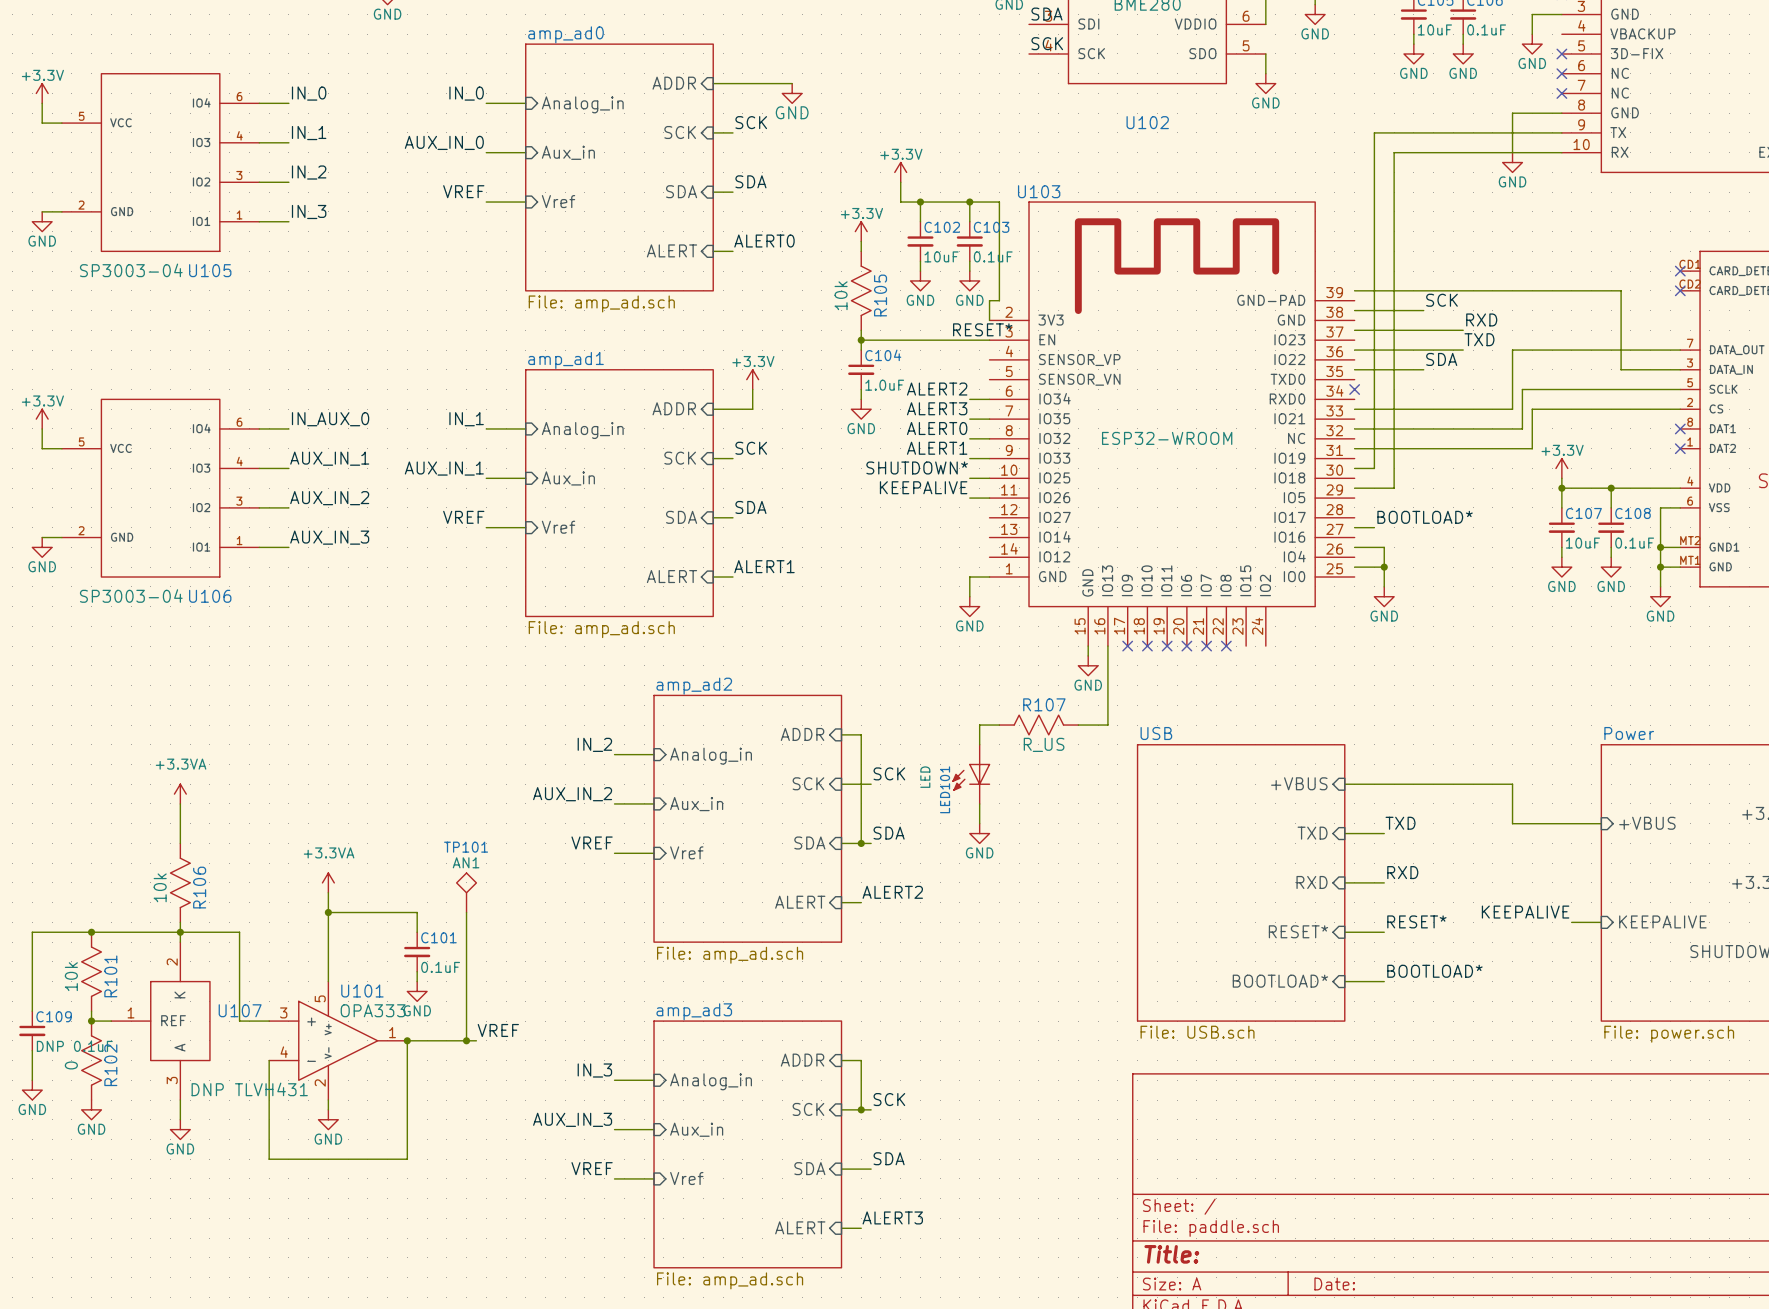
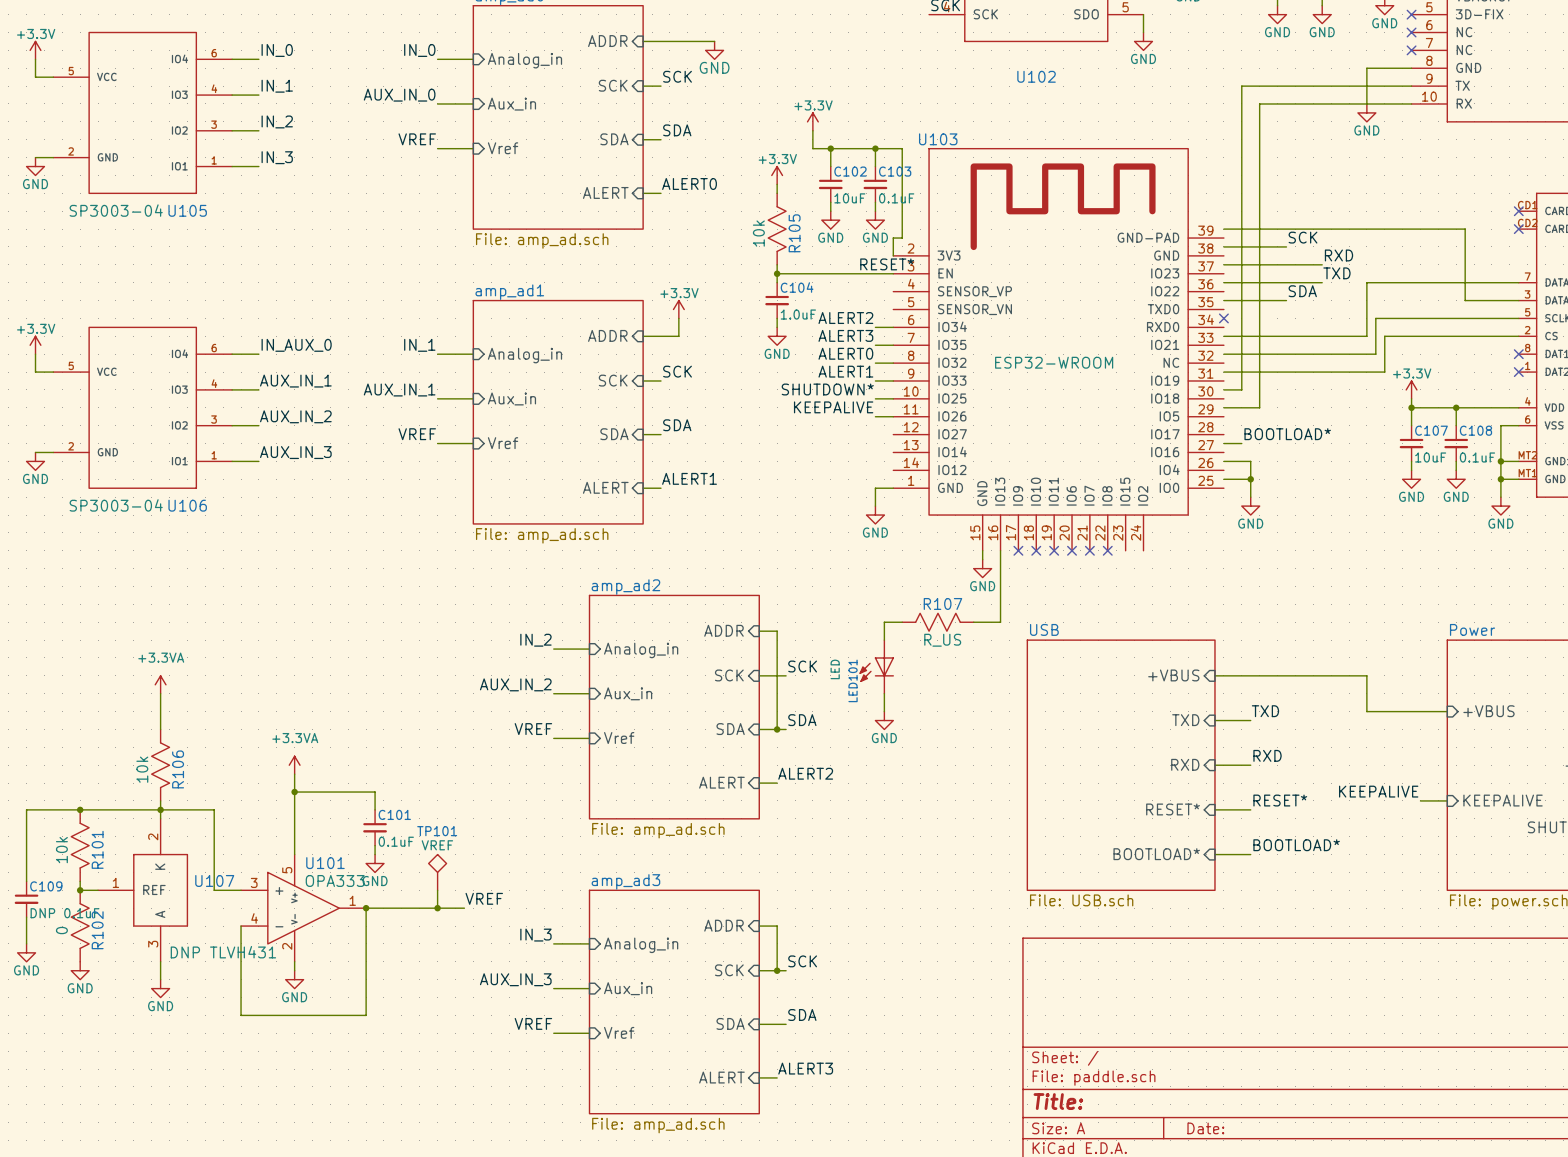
TP101 value: AN1 (466, 862) -> VREF (437, 845)
TP101 position: (466, 892) -> (437, 872)
wire: (466, 912) (466, 1040) -> none
wire: none -> (437, 890) (437, 908)
label position: VREF (498, 1030) -> VREF (484, 898)
junction position: (466, 1040) -> (437, 908)
wire: none -> (428, 908) (464, 908)

